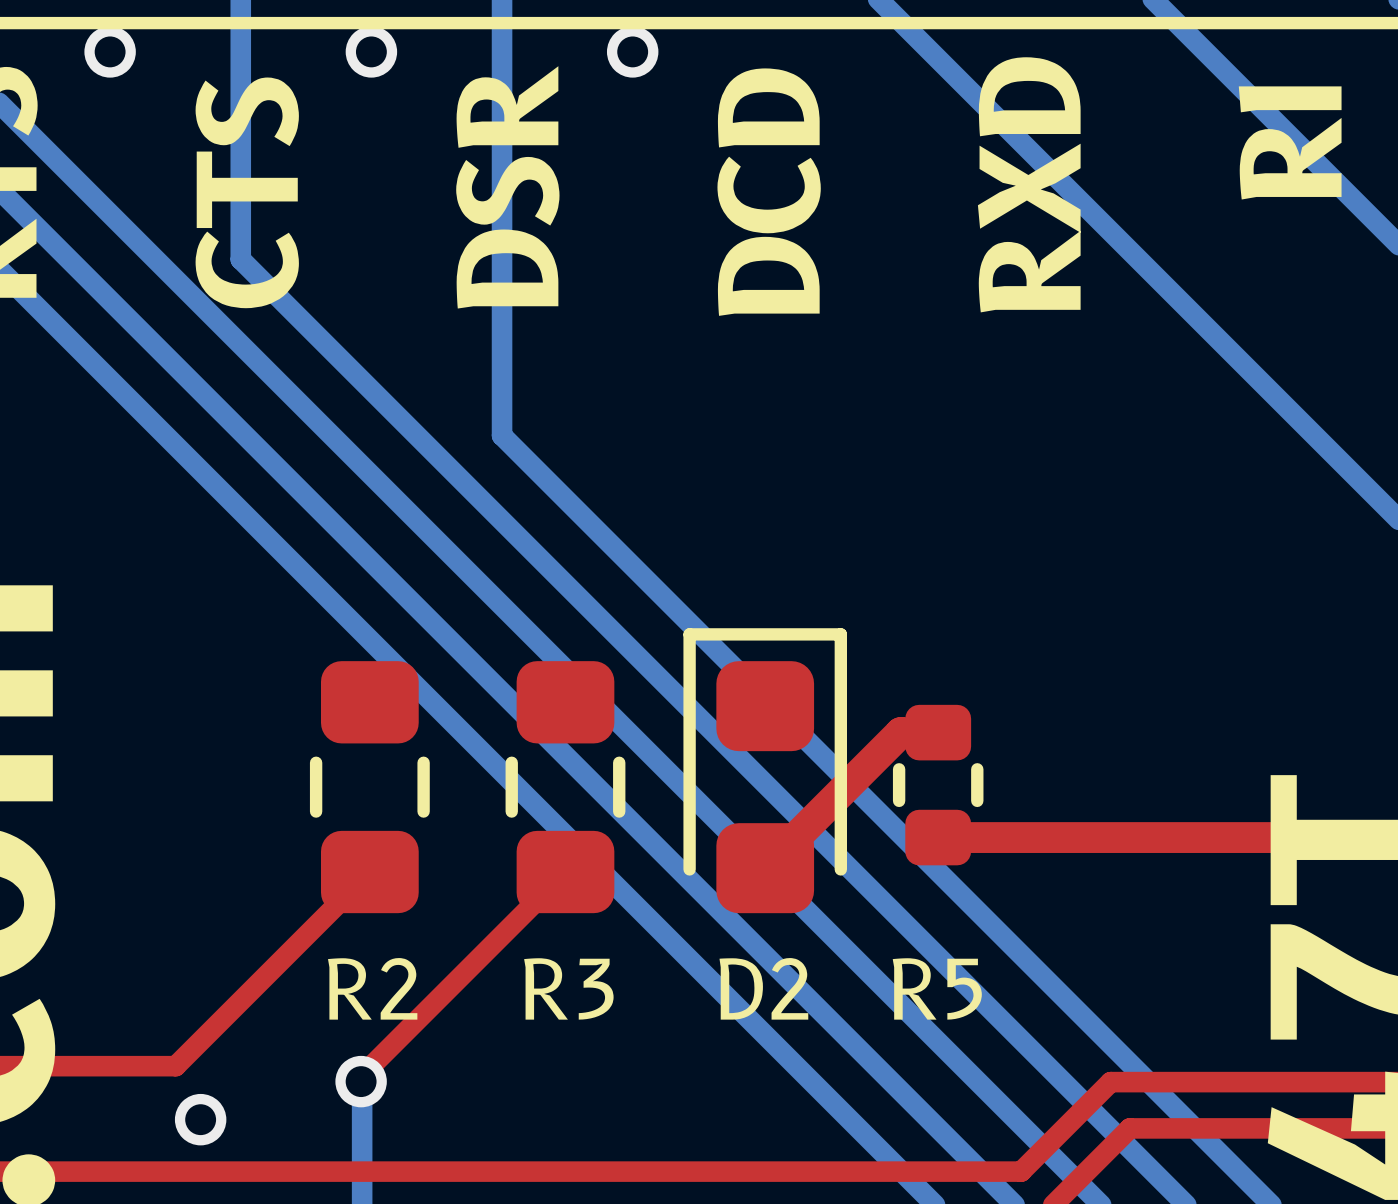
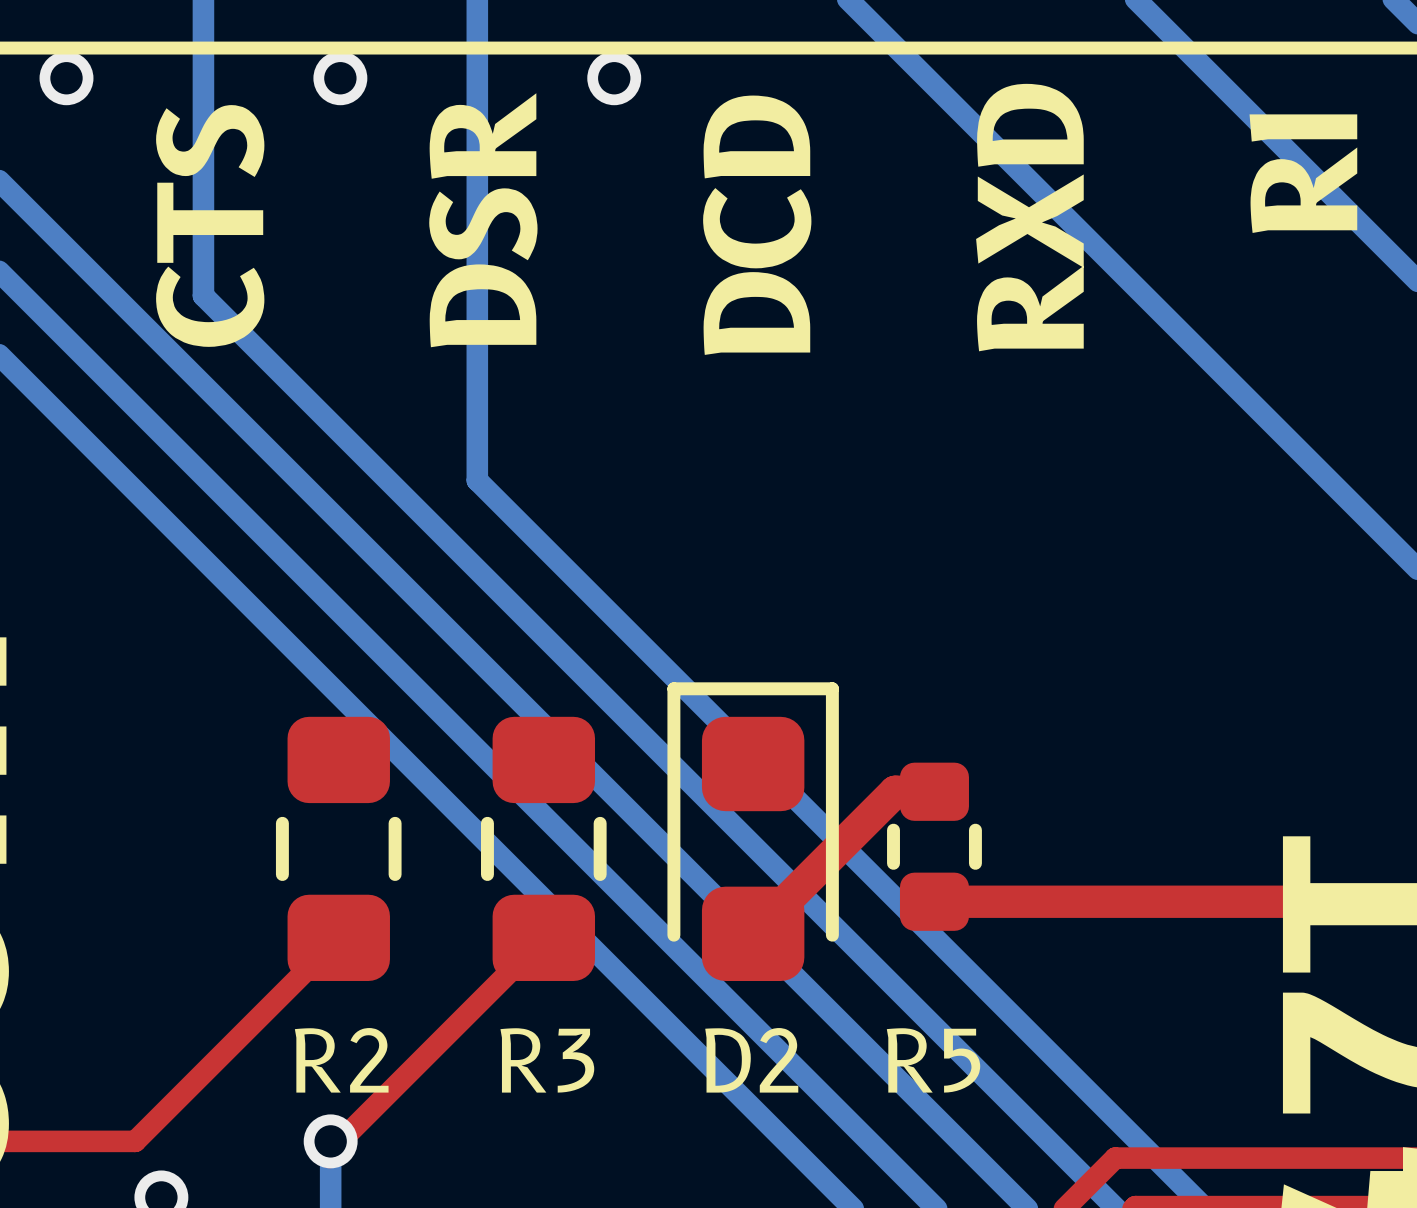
via position: (361, 1081) -> (330, 1141)

